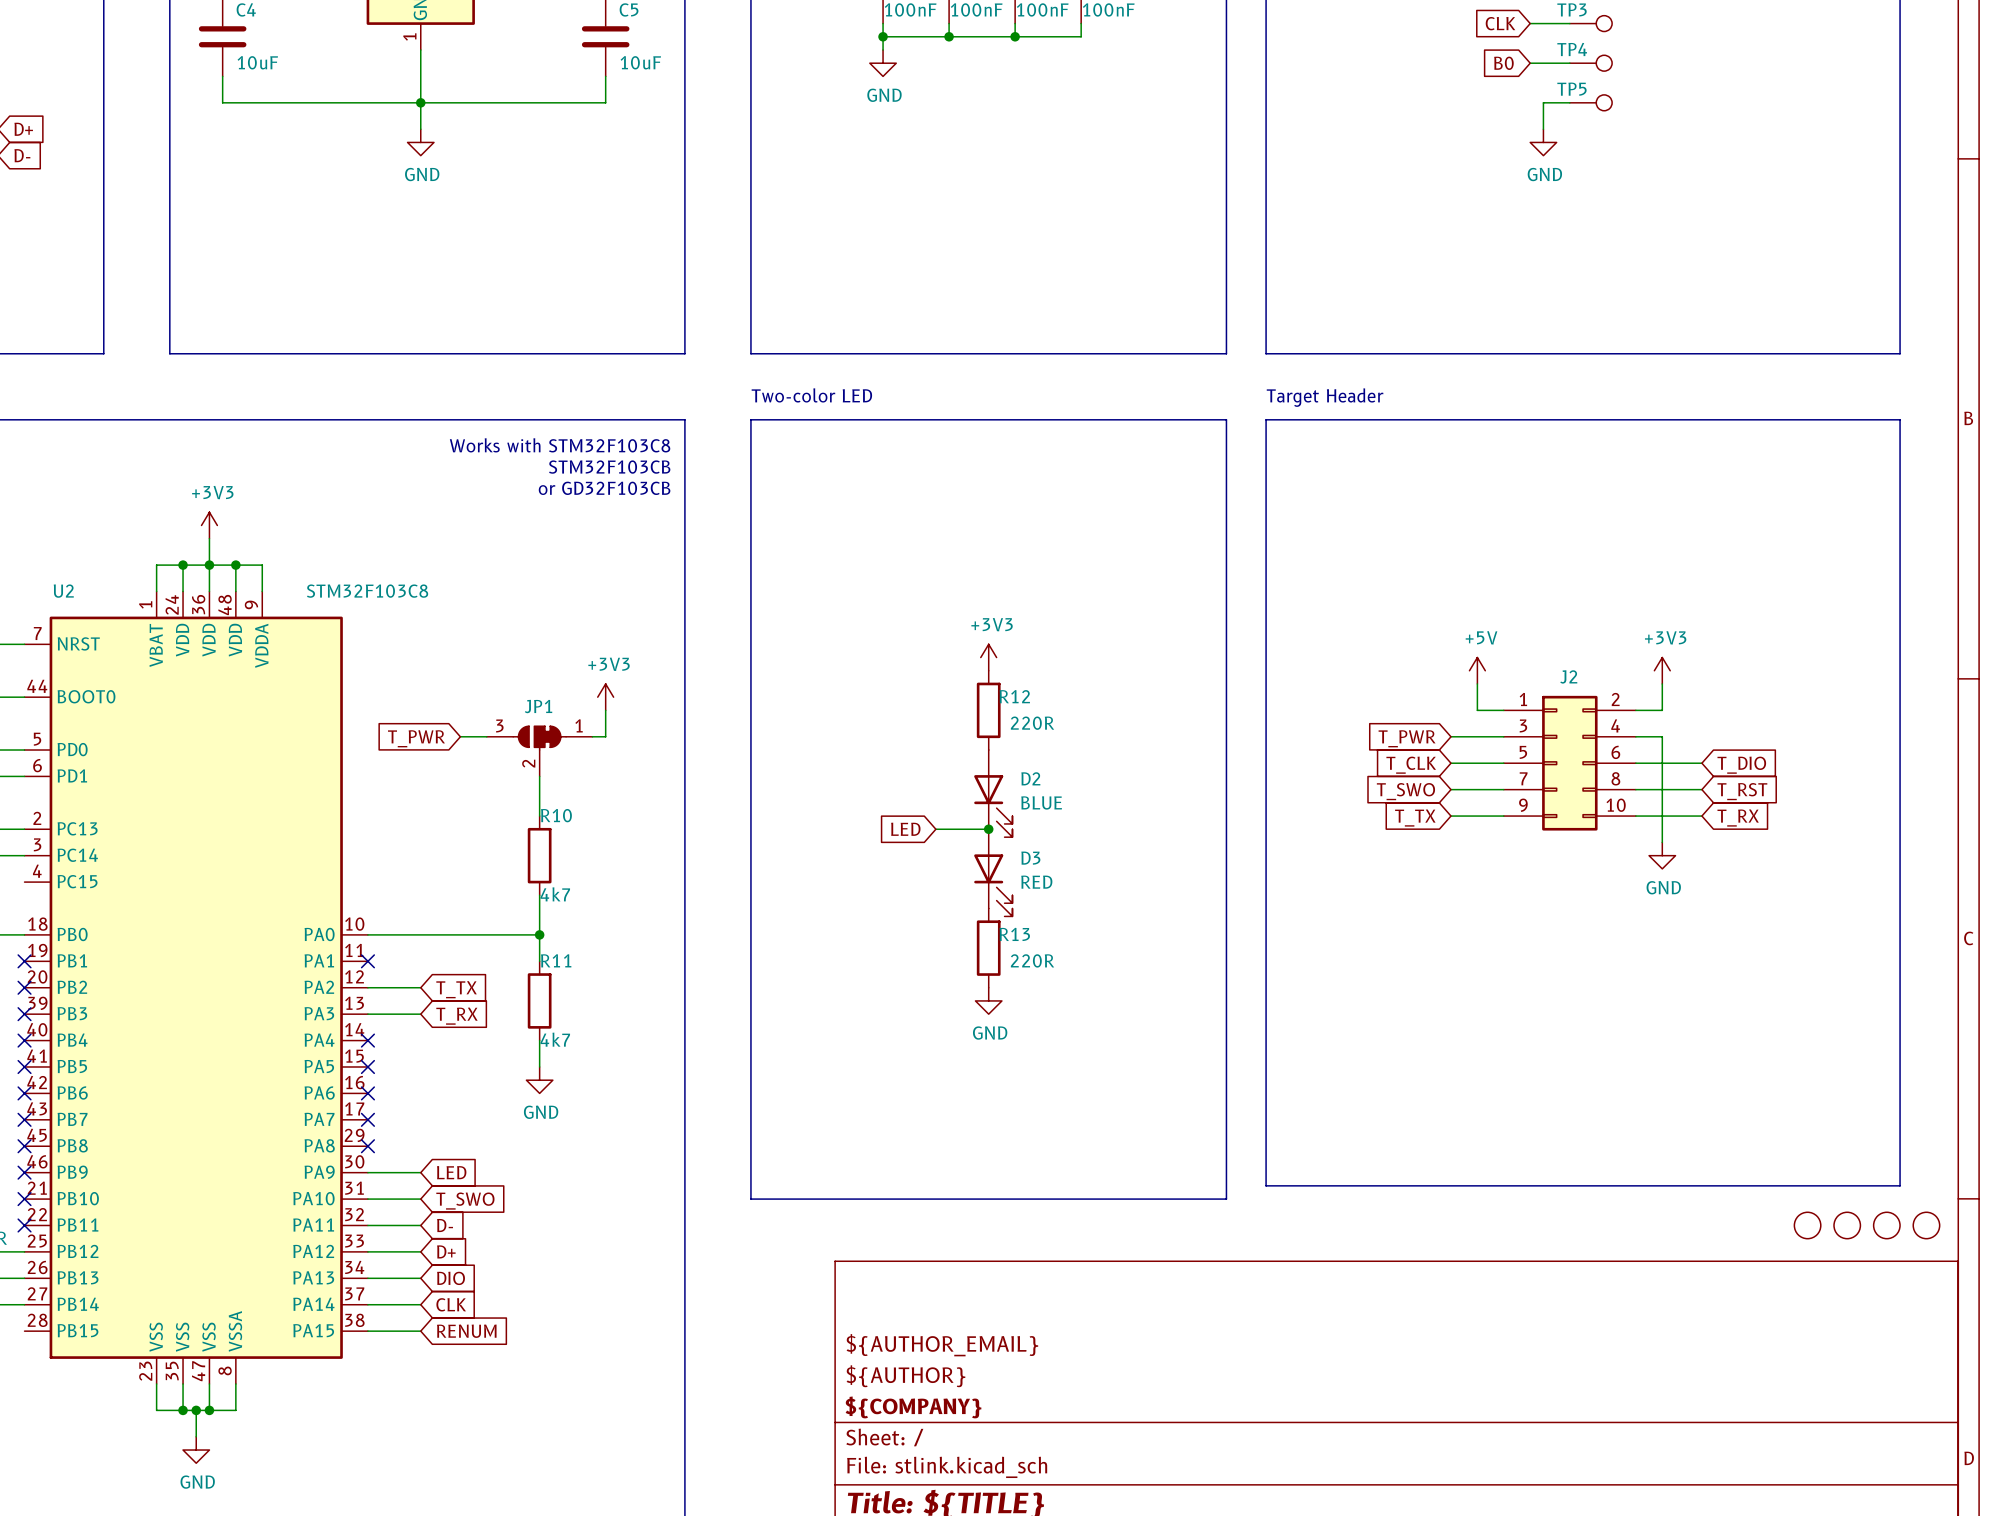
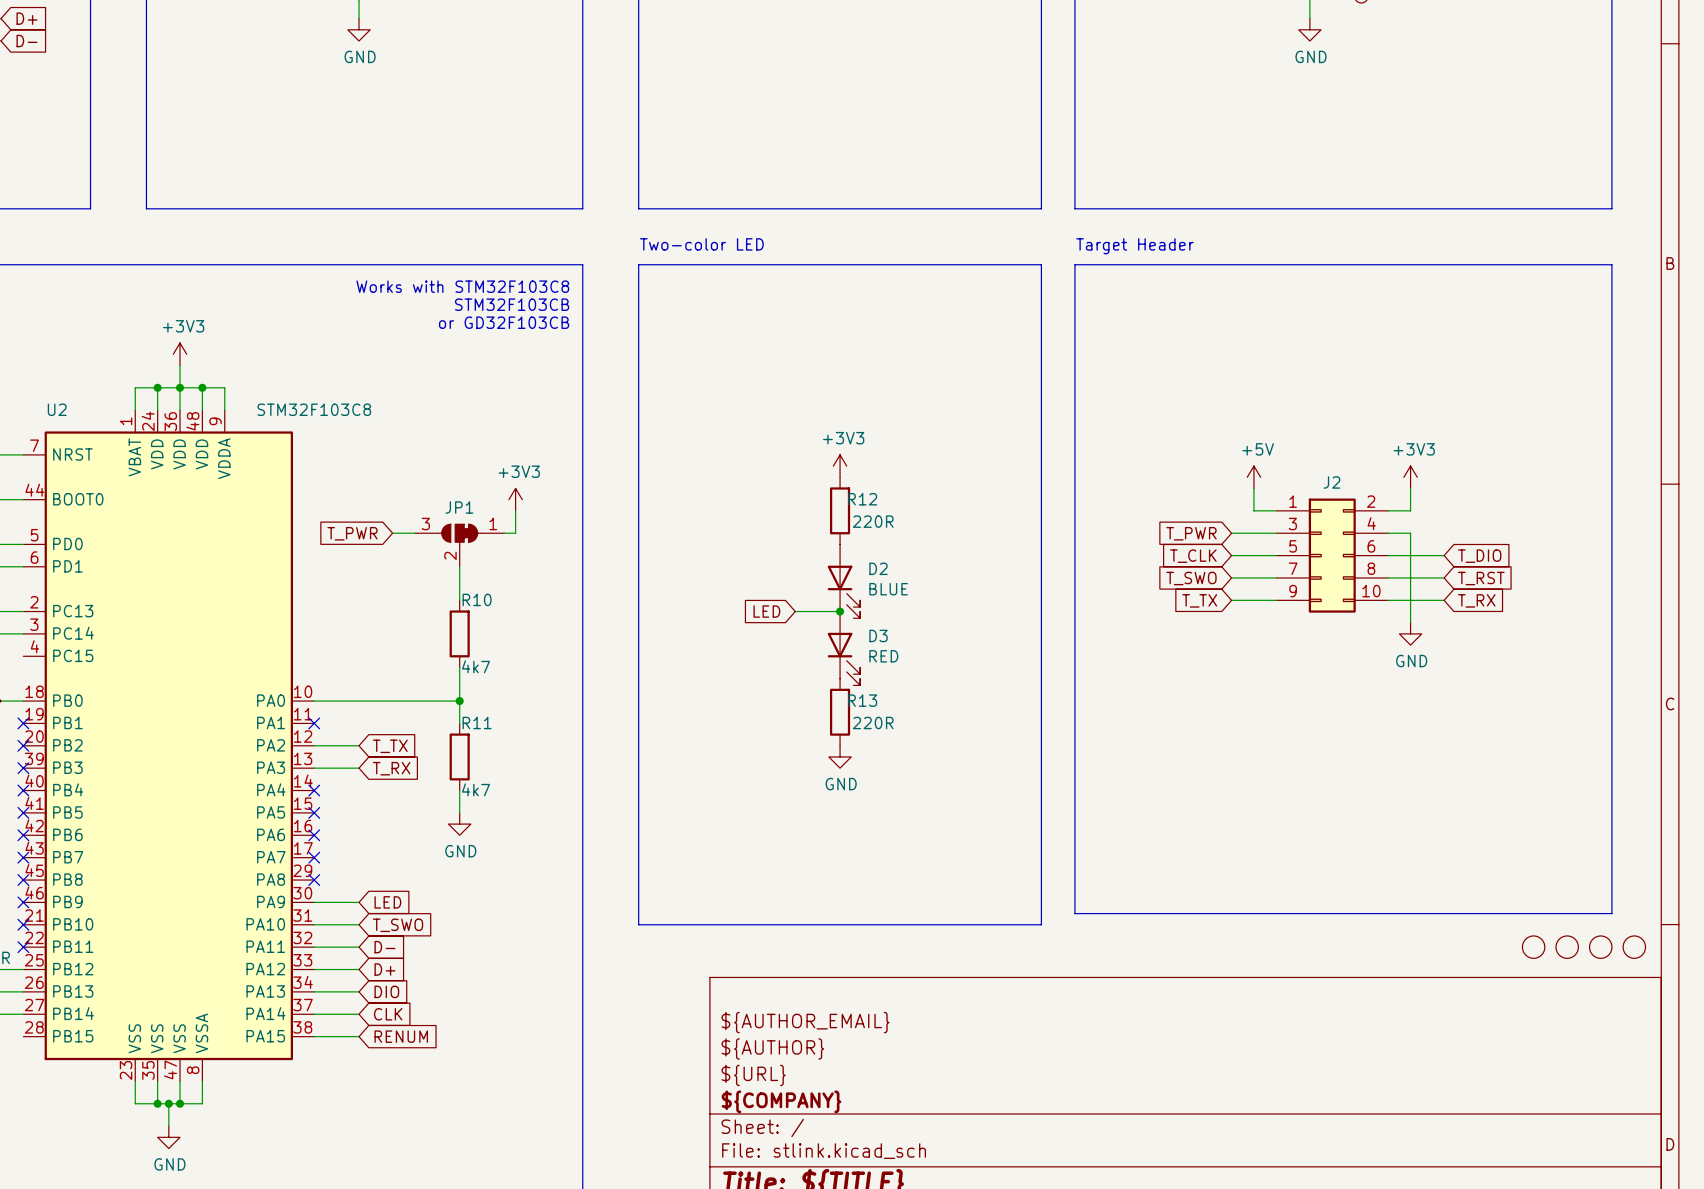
title block: none -> ${AUTHOR_EMAIL} (805, 1022)
title block: ${AUTHOR_EMAIL} (942, 1345) -> ${AUTHOR} (772, 1048)
title block: ${AUTHOR} (905, 1376) -> ${URL} (753, 1075)

